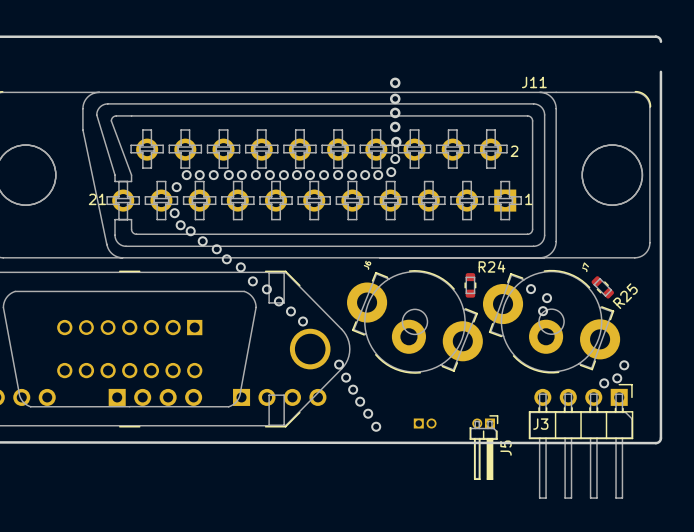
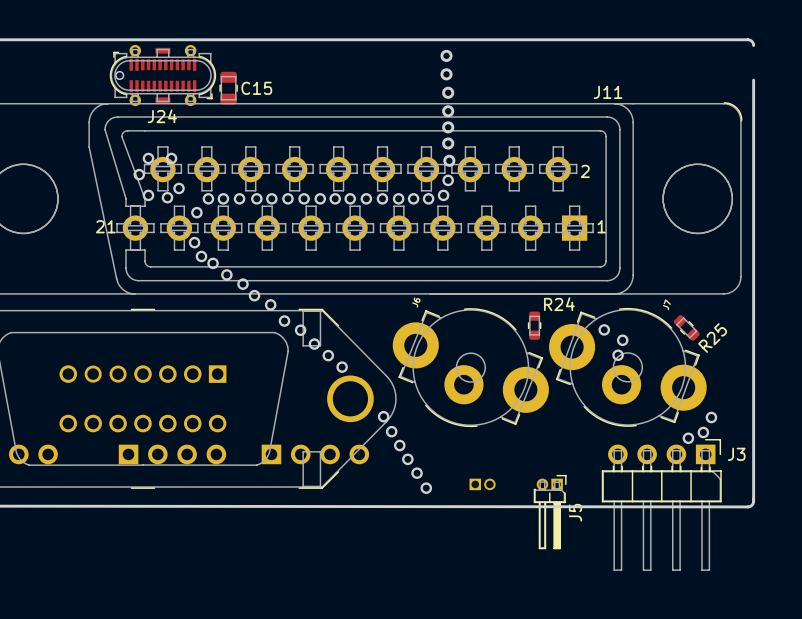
round board edge: none -> [440, 49, 453, 62]
round board edge: none -> [440, 68, 453, 81]
J24: none -> (162, 75)
C15: none -> (228, 88)
round board edge: none -> [142, 152, 155, 165]
round board edge: none -> [165, 152, 178, 165]
round board edge: none -> [133, 168, 146, 181]
round board edge: none -> [173, 182, 185, 195]
round board edge: none -> [142, 189, 155, 202]
round board edge: none -> [161, 191, 174, 204]
J3 name position: J3 (540, 424) -> J3 (736, 454)

